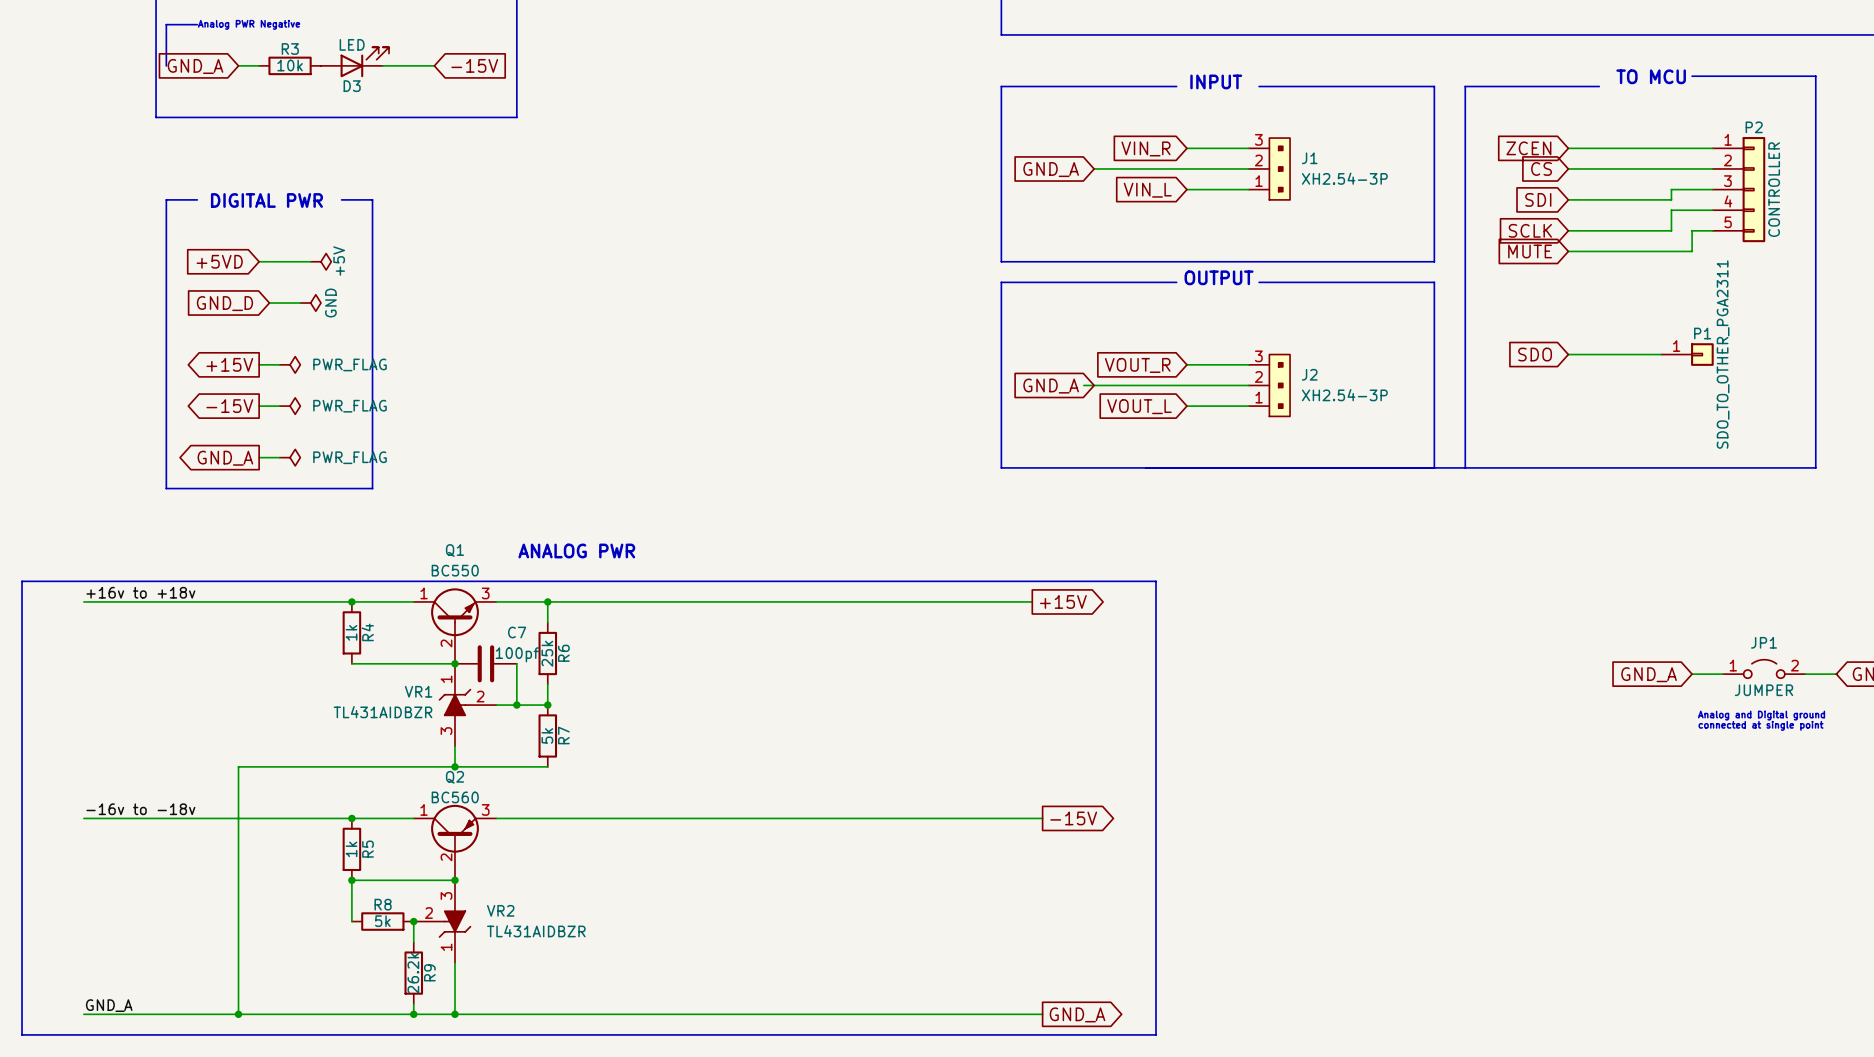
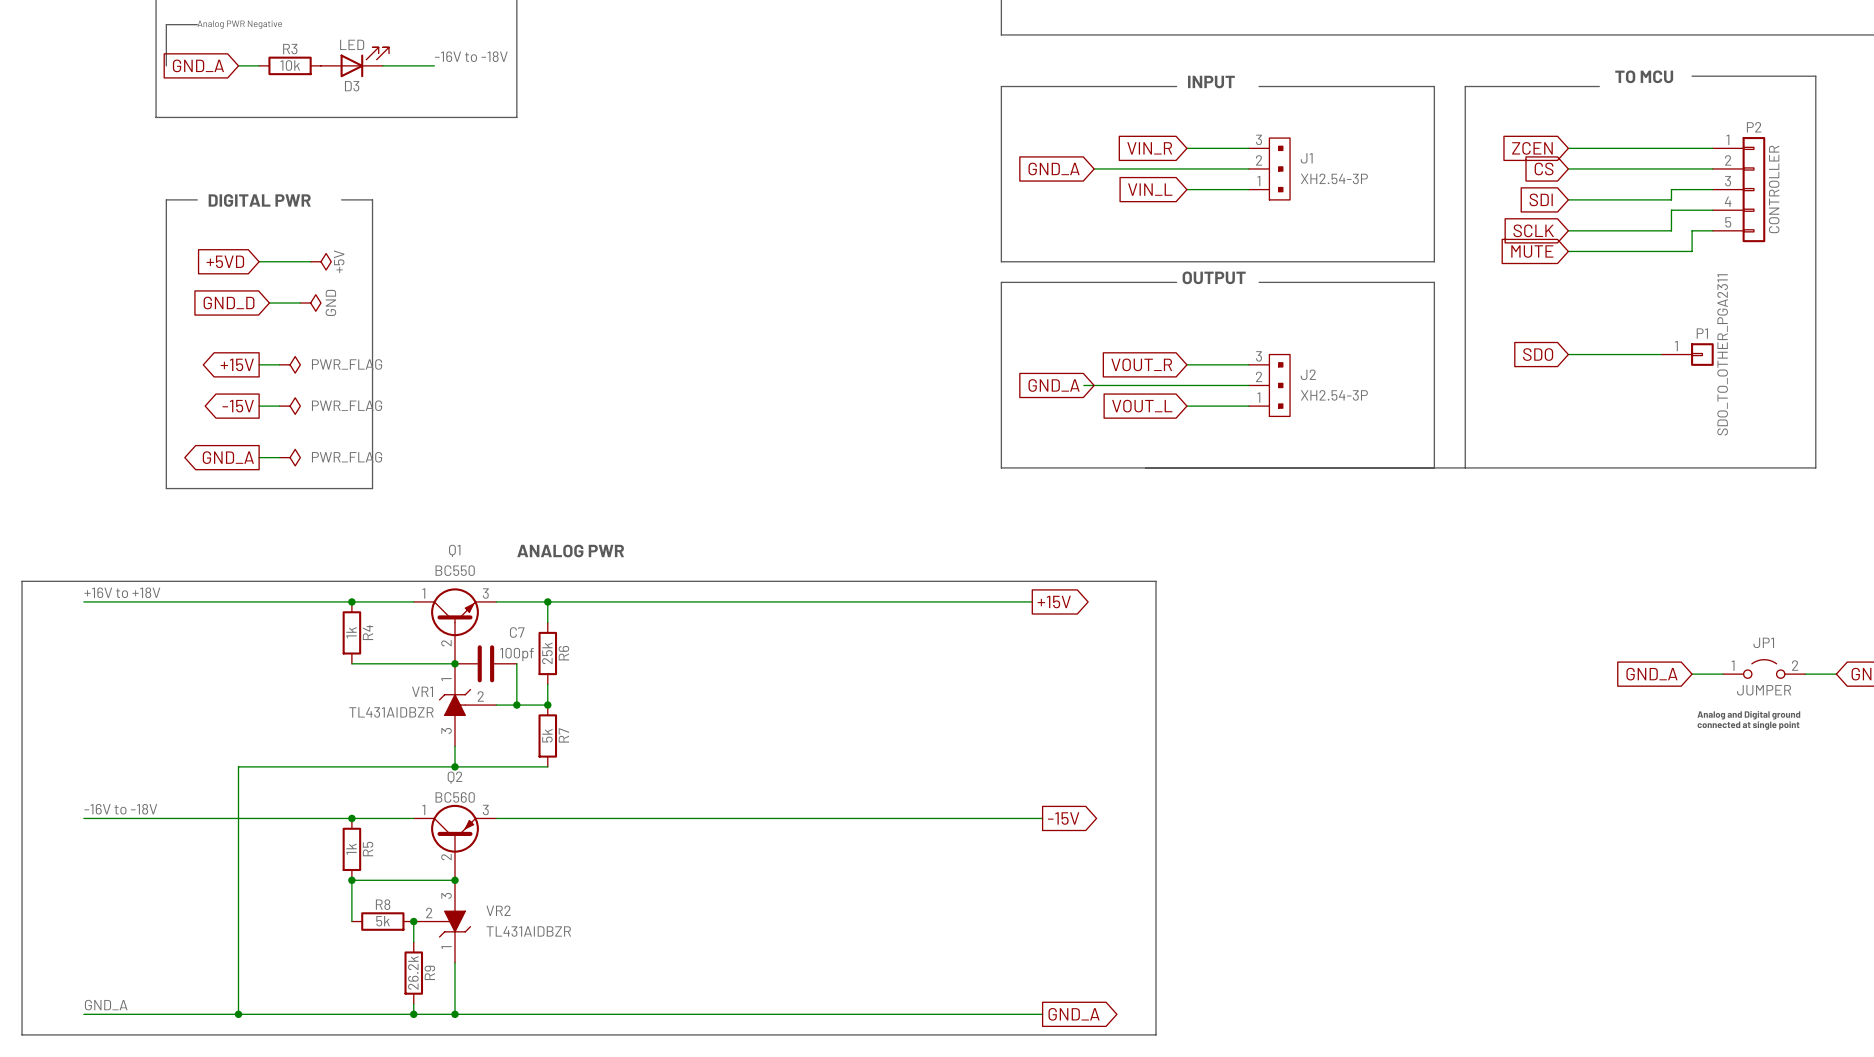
label: none -> -16V to -18V (471, 56)
global label: -15V (474, 65) -> none
label: +16v to +18v (140, 592) -> +16V to +18V (122, 592)
label: -16v to -18v (140, 809) -> -16V to -18V (120, 809)

